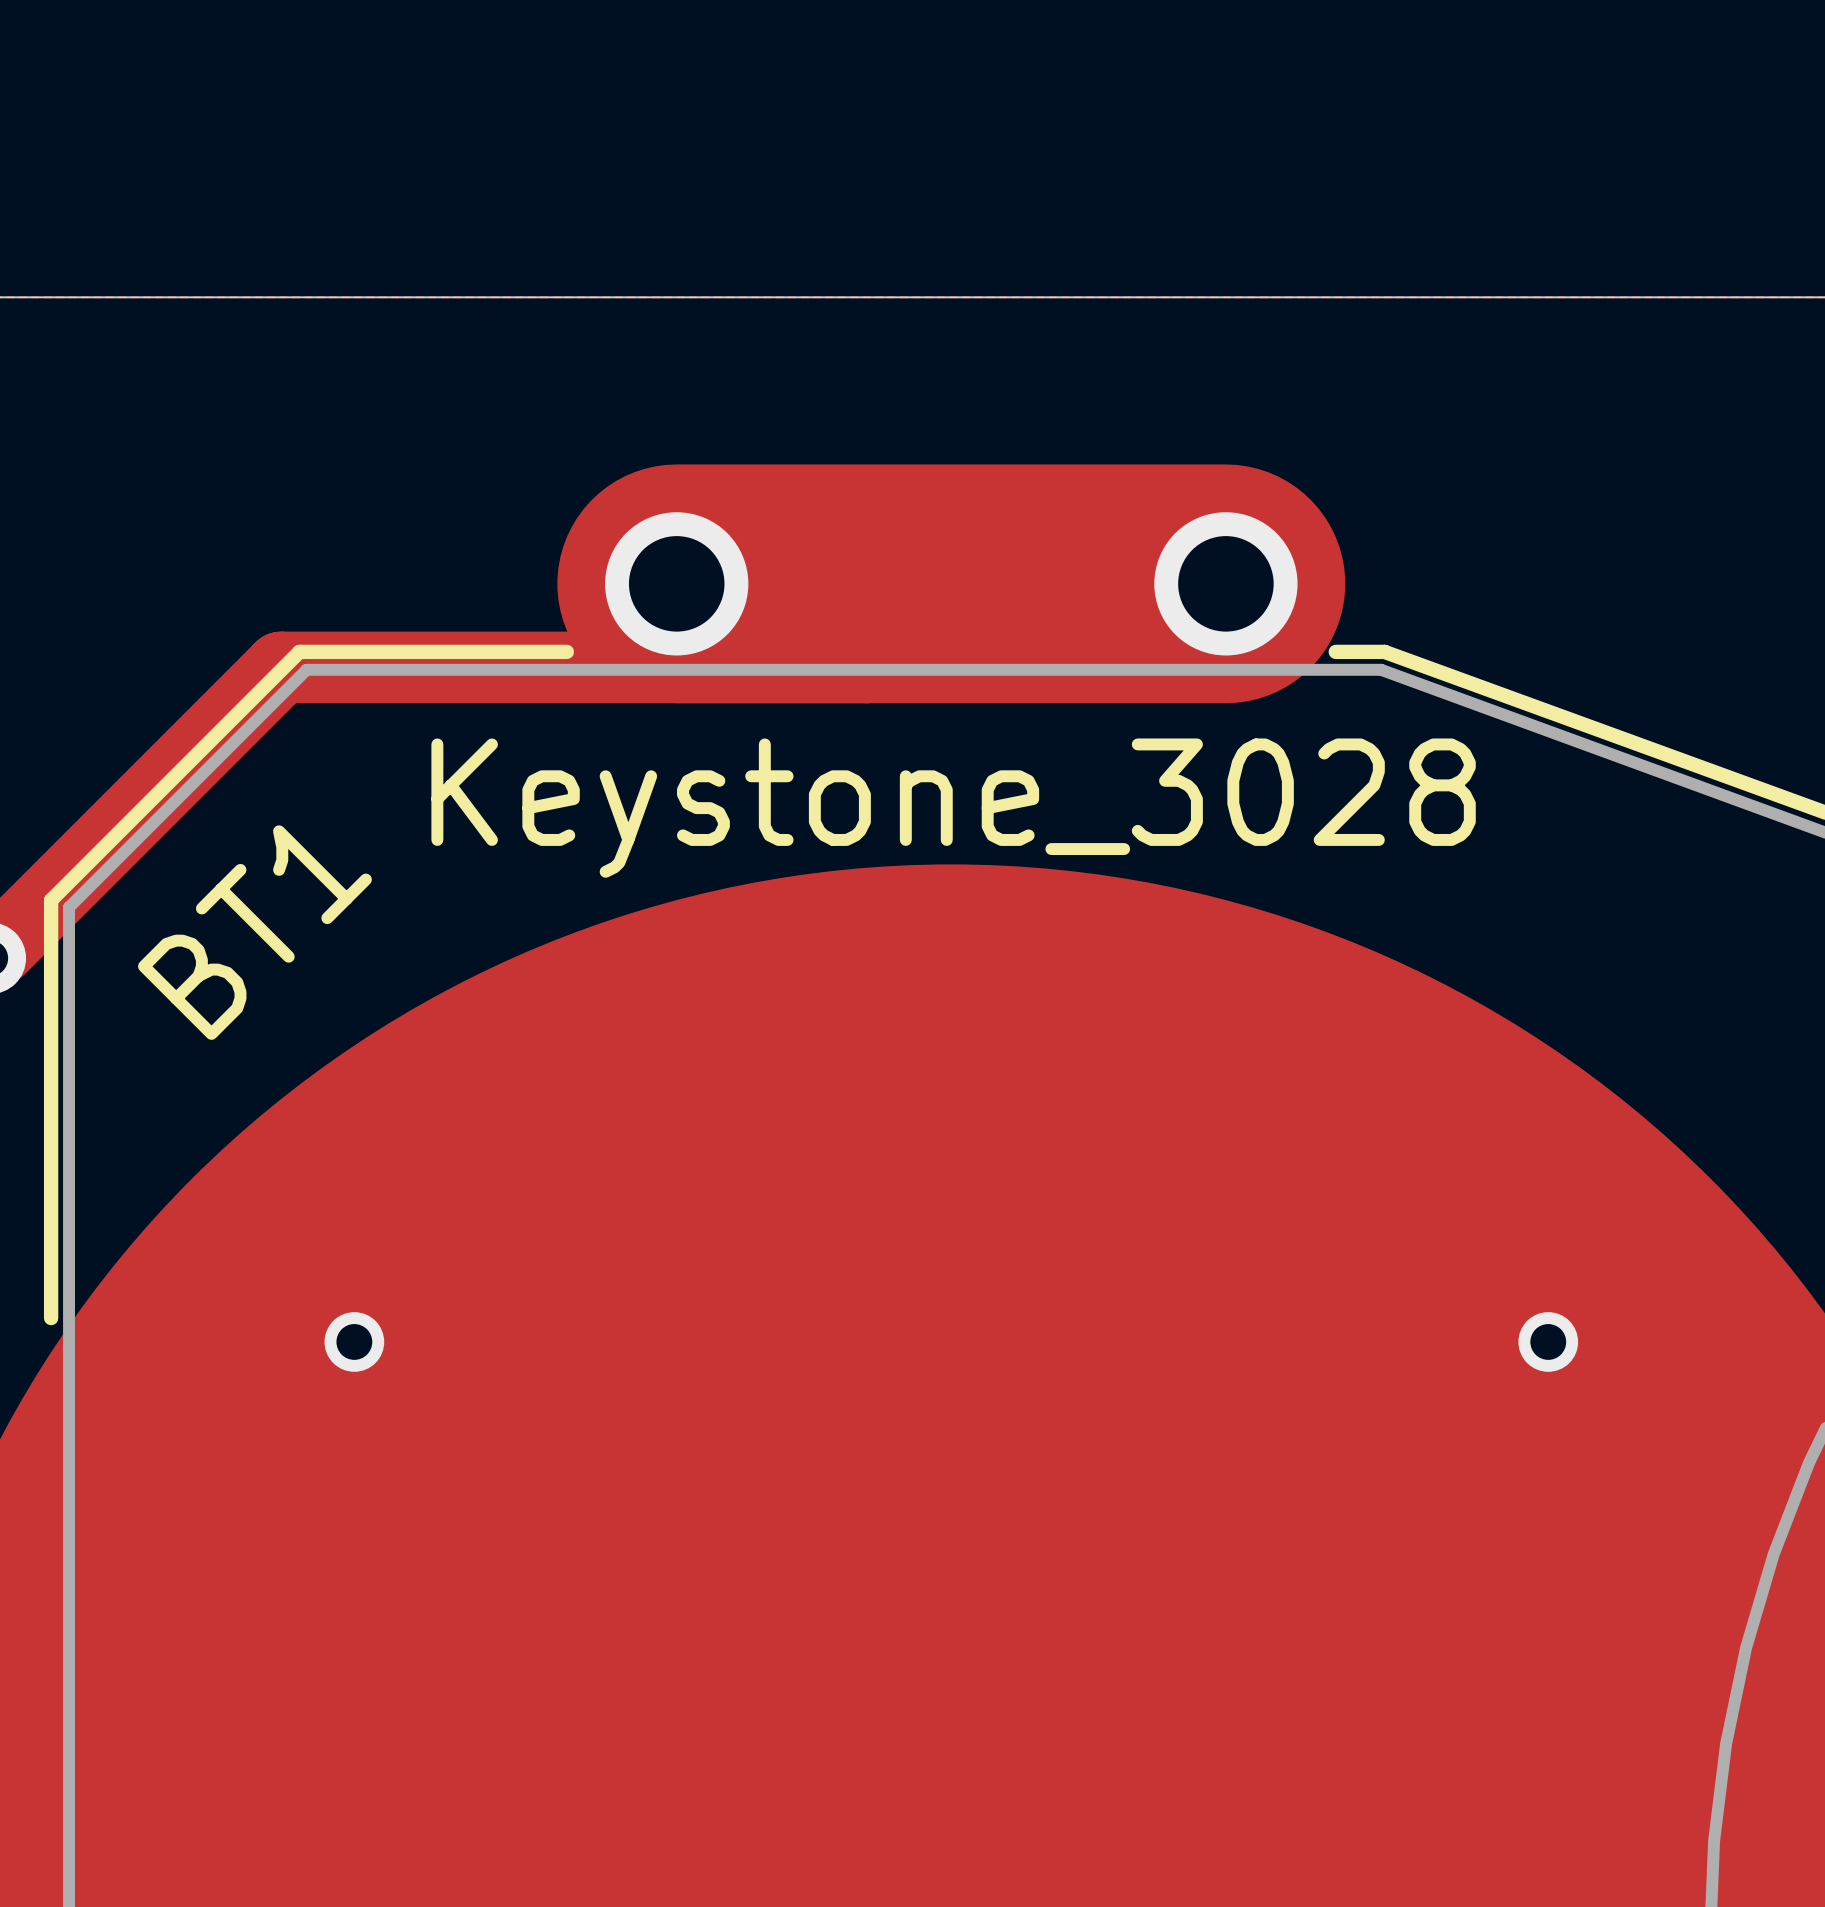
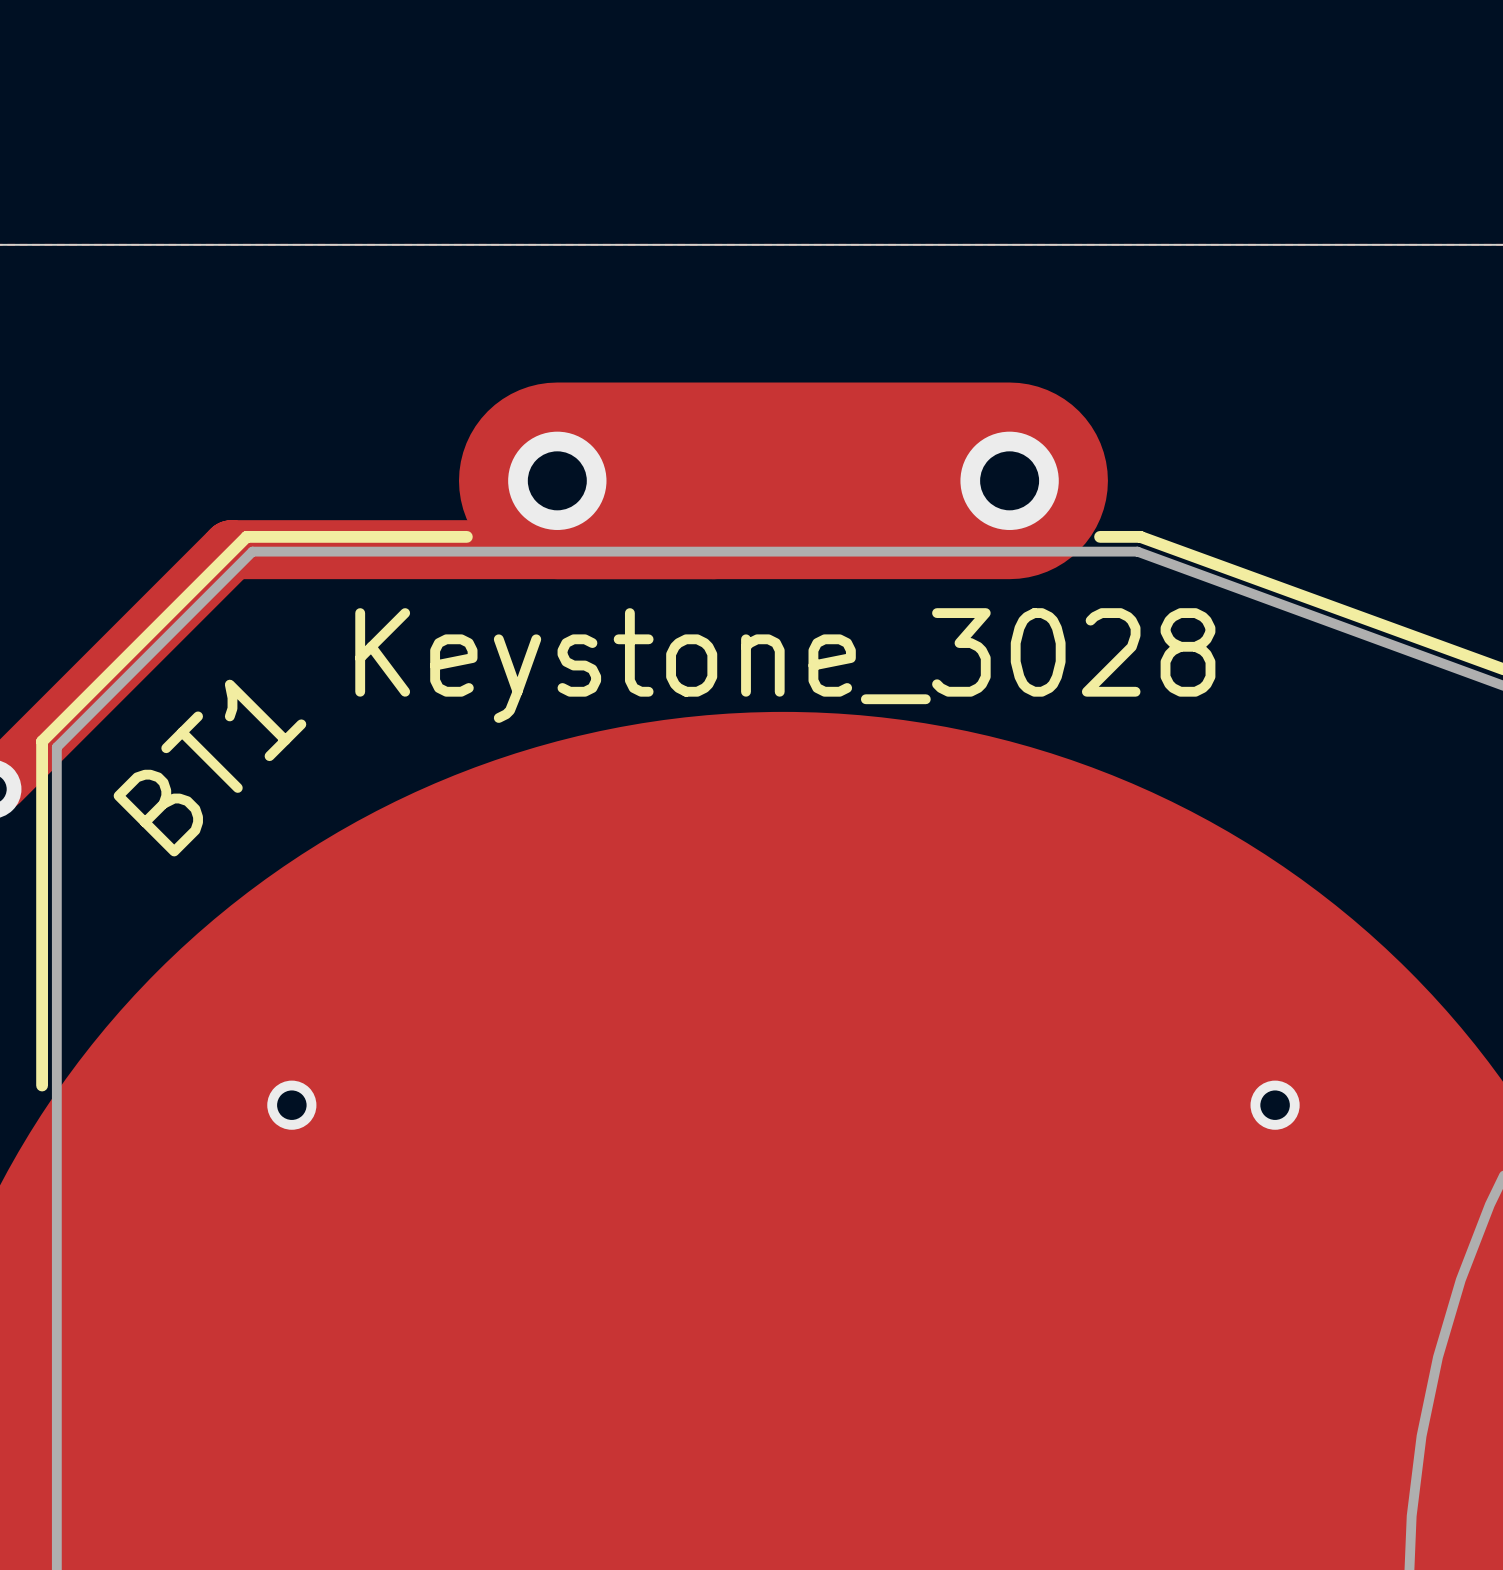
via size: [605, 512, 749, 656] -> [508, 431, 607, 530]
via size: [1154, 512, 1298, 656] -> [960, 431, 1059, 530]

